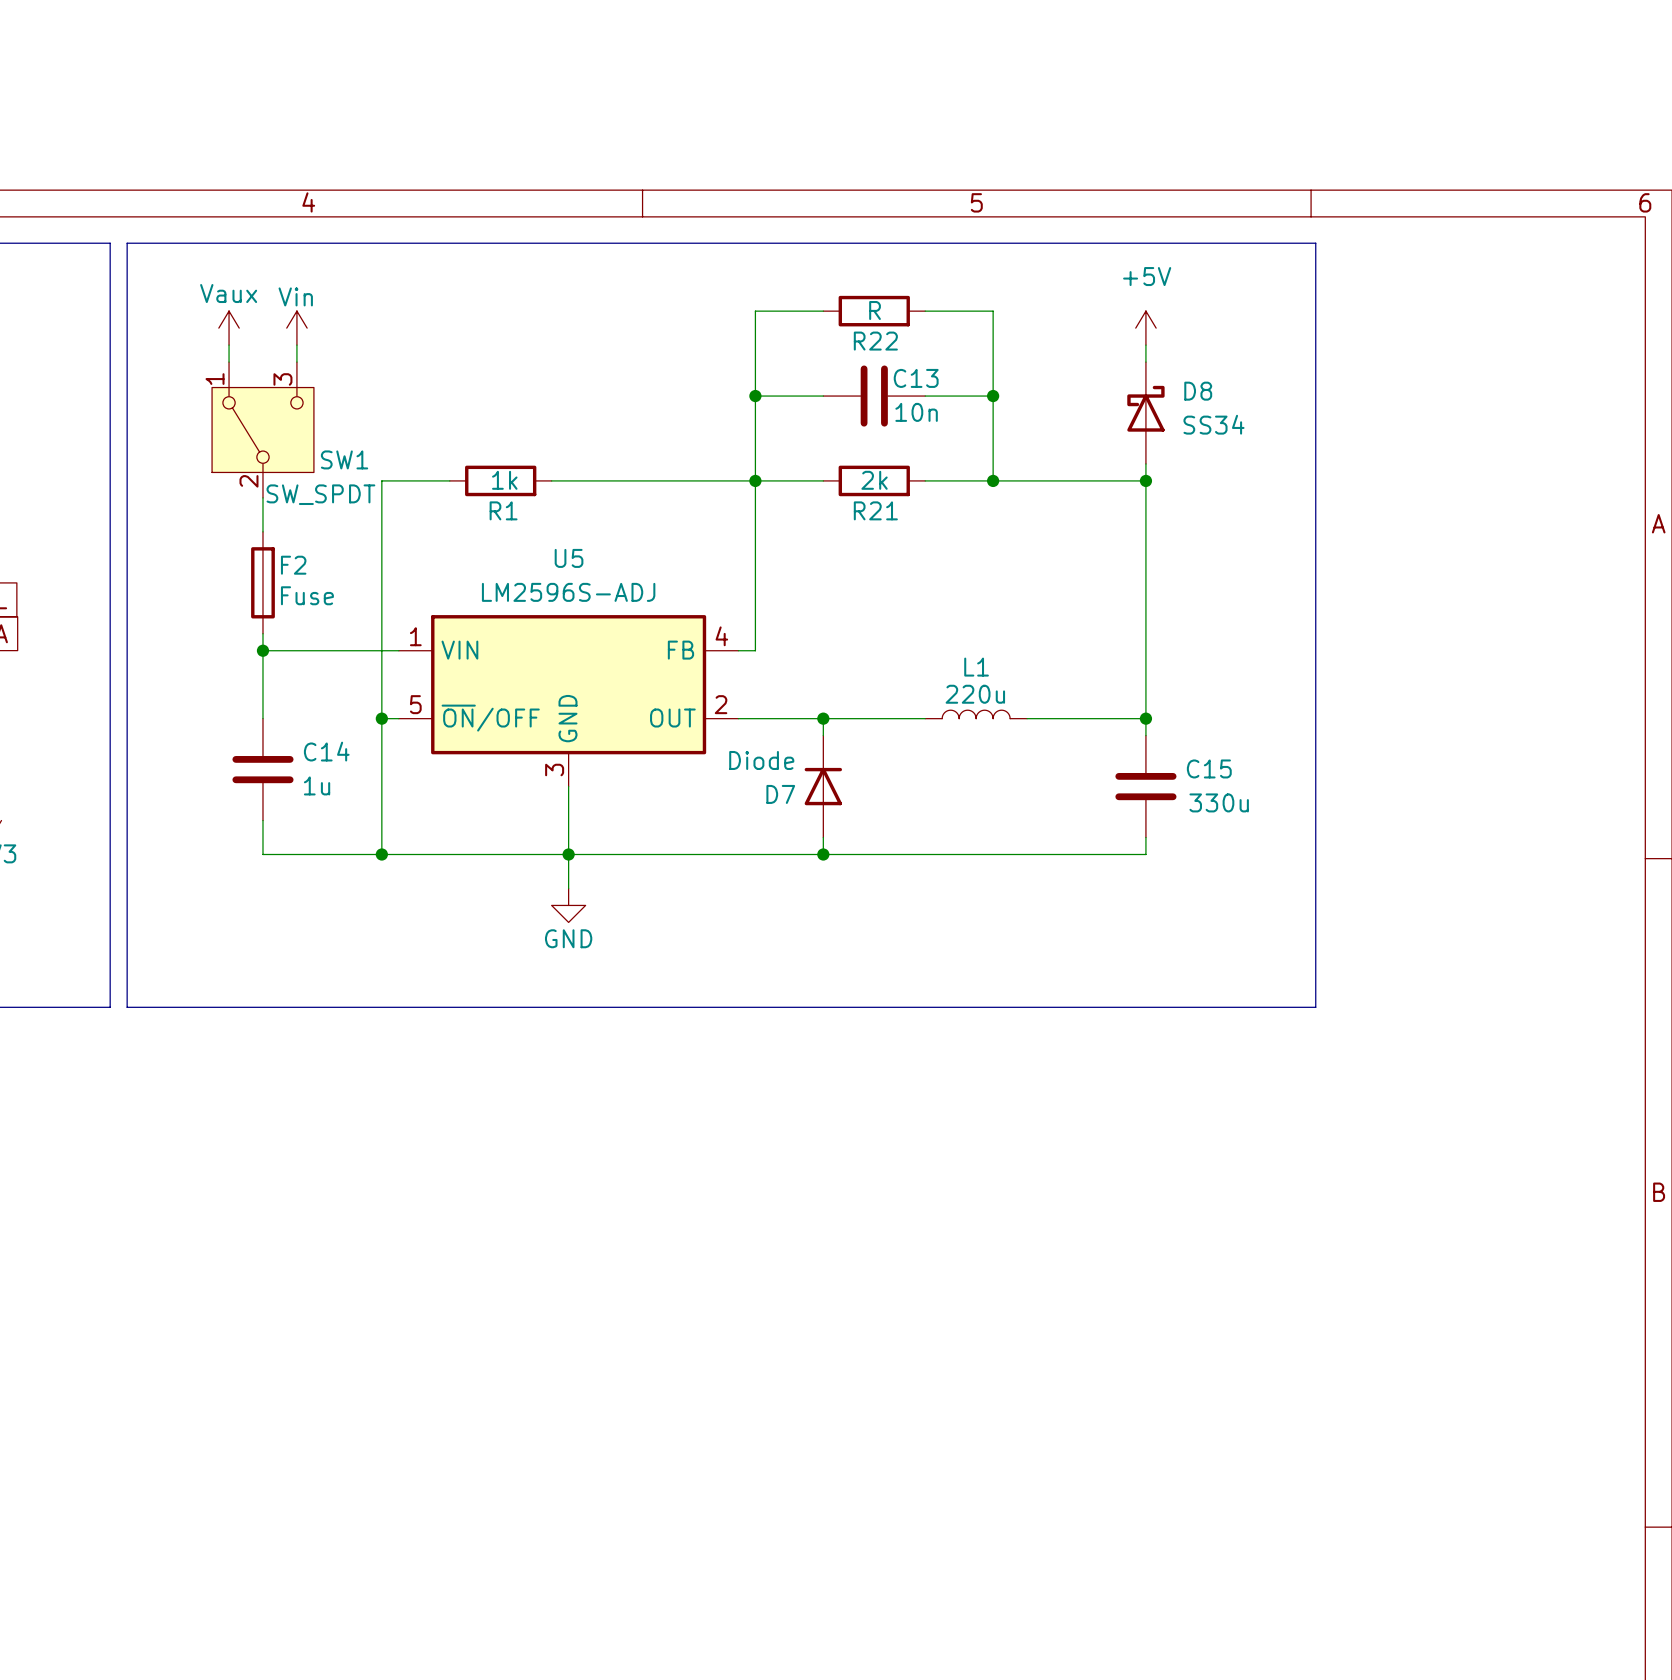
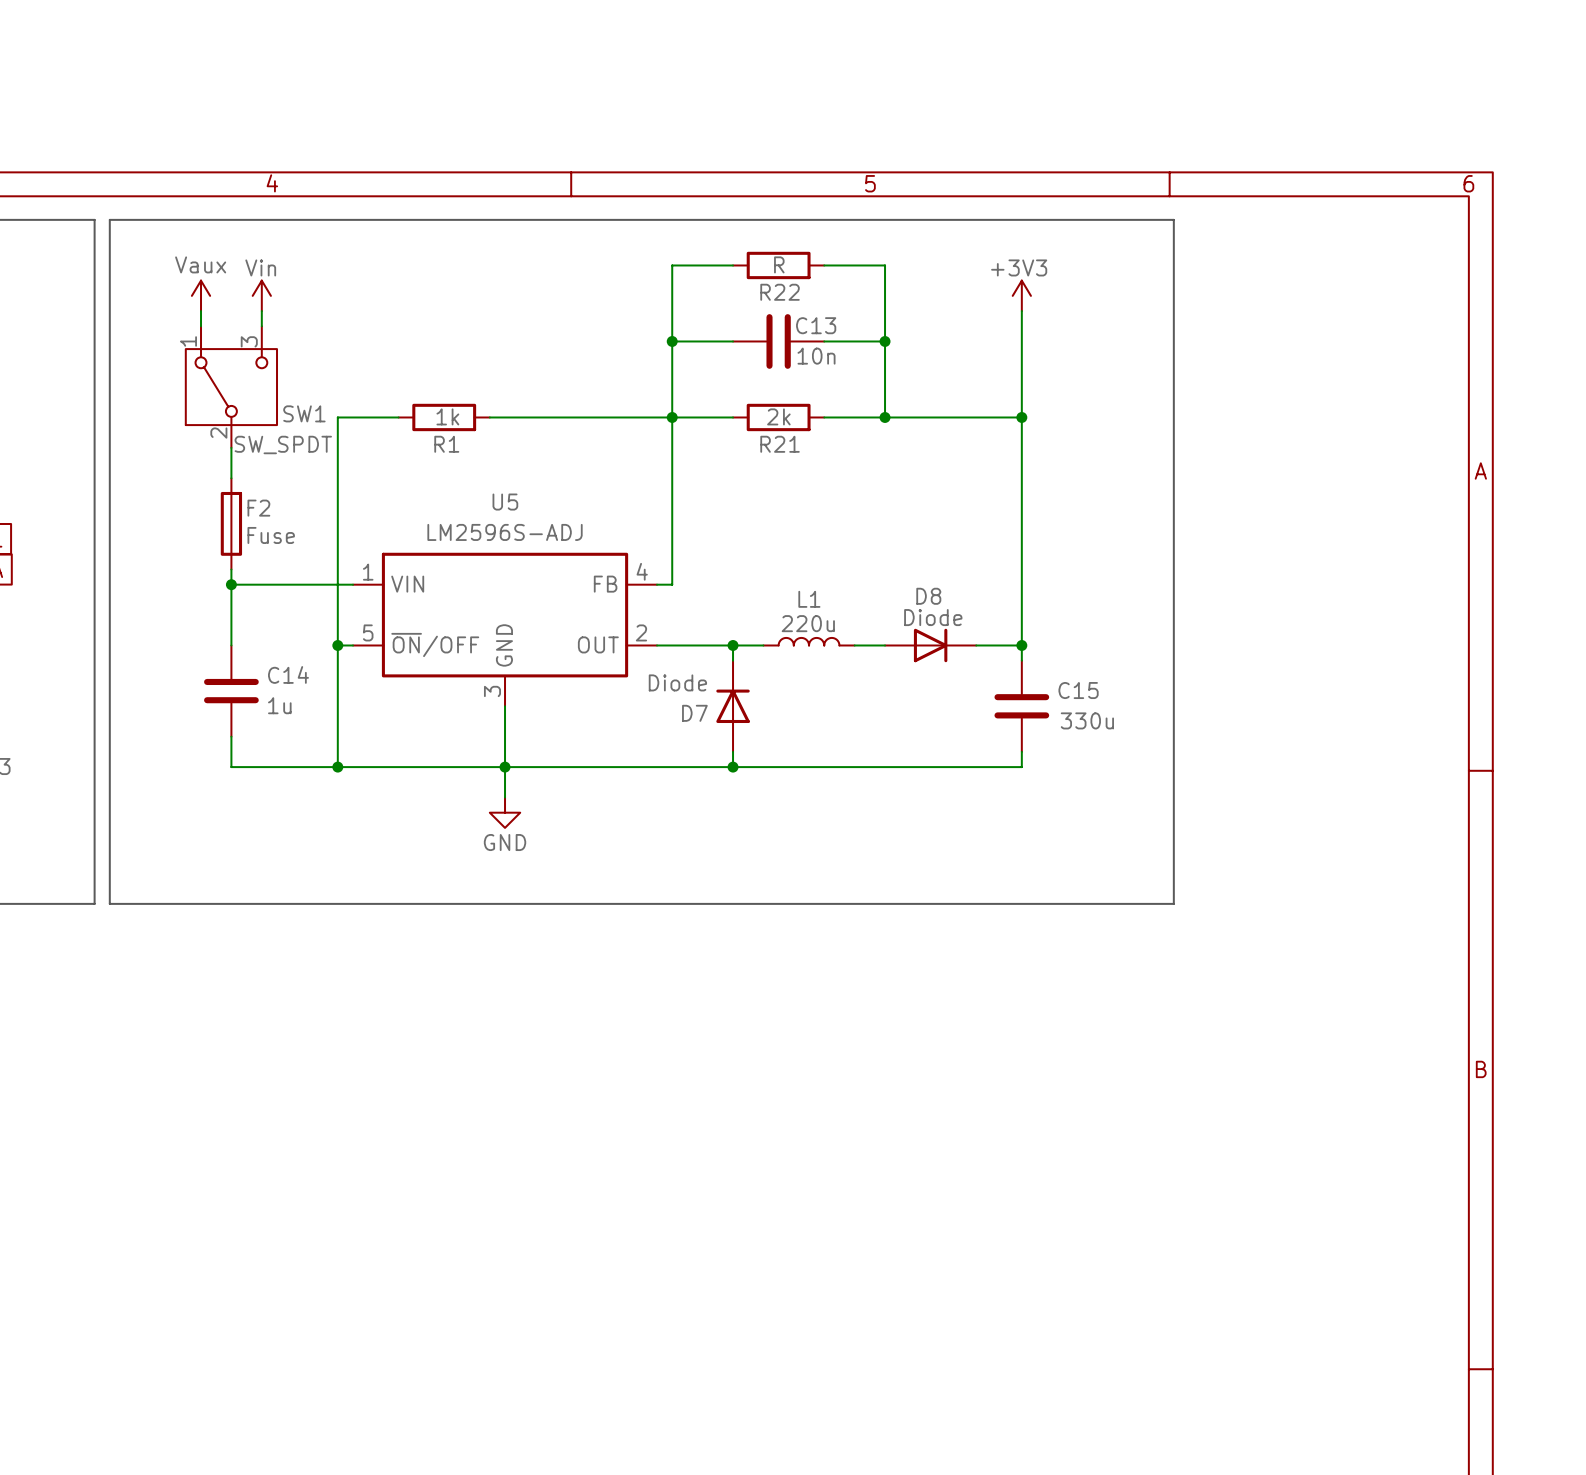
wire: (755, 311) (823, 311) -> (672, 280) (672, 265) (733, 265)
R22 position: (874, 311) -> (778, 265)
wire: (925, 311) (993, 311) -> (824, 265) (885, 265) (885, 280)
power symbol: +5V (1145, 328) -> +3V3 (1021, 295)
D8 symbol: [1127, 362, 1165, 464] -> [885, 628, 977, 663]
wire: none -> (1021, 326) (1021, 417) (824, 417)
D8 name position: D8 (1198, 391) -> D8 (928, 596)
wire: (755, 396) (823, 396) -> (672, 341) (733, 341)
junction position: (755, 396) -> (672, 341)
C13 position: (874, 396) -> (778, 341)
wire: (925, 396) (993, 396) -> (824, 341) (885, 341)
junction position: (993, 396) -> (885, 341)
D8 value: SS34 (1213, 424) -> Diode (933, 617)
wire: (993, 463) (993, 480) -> none
wire: (381, 480) (449, 480) -> (337, 432) (337, 417) (398, 417)
R1 position: (500, 480) -> (444, 417)
wire: (551, 480) (823, 480) -> (489, 417) (733, 417)
junction position: (755, 480) -> (672, 417)
R21 position: (874, 480) -> (778, 417)
wire: (925, 480) (1145, 480) -> none
junction position: (993, 480) -> (885, 417)
junction position: (1145, 480) -> (1021, 417)
L1 position: (976, 714) -> (809, 641)
wire: (857, 718) (925, 718) -> none
wire: none -> (854, 645) (885, 645)

